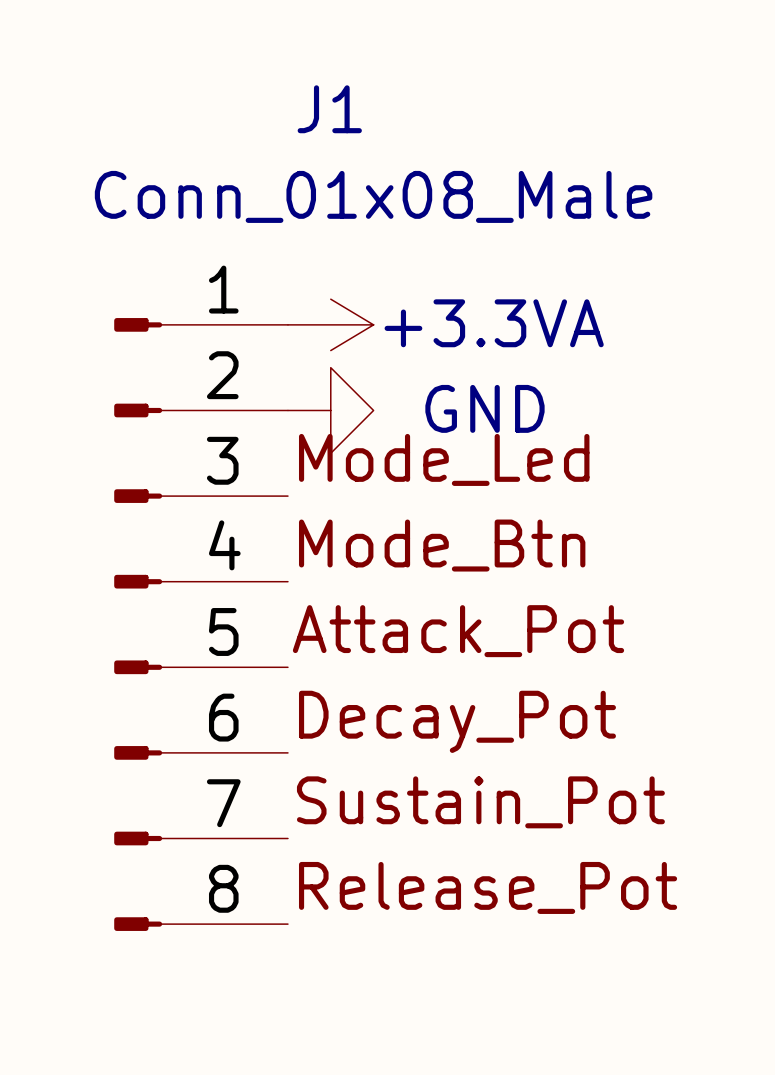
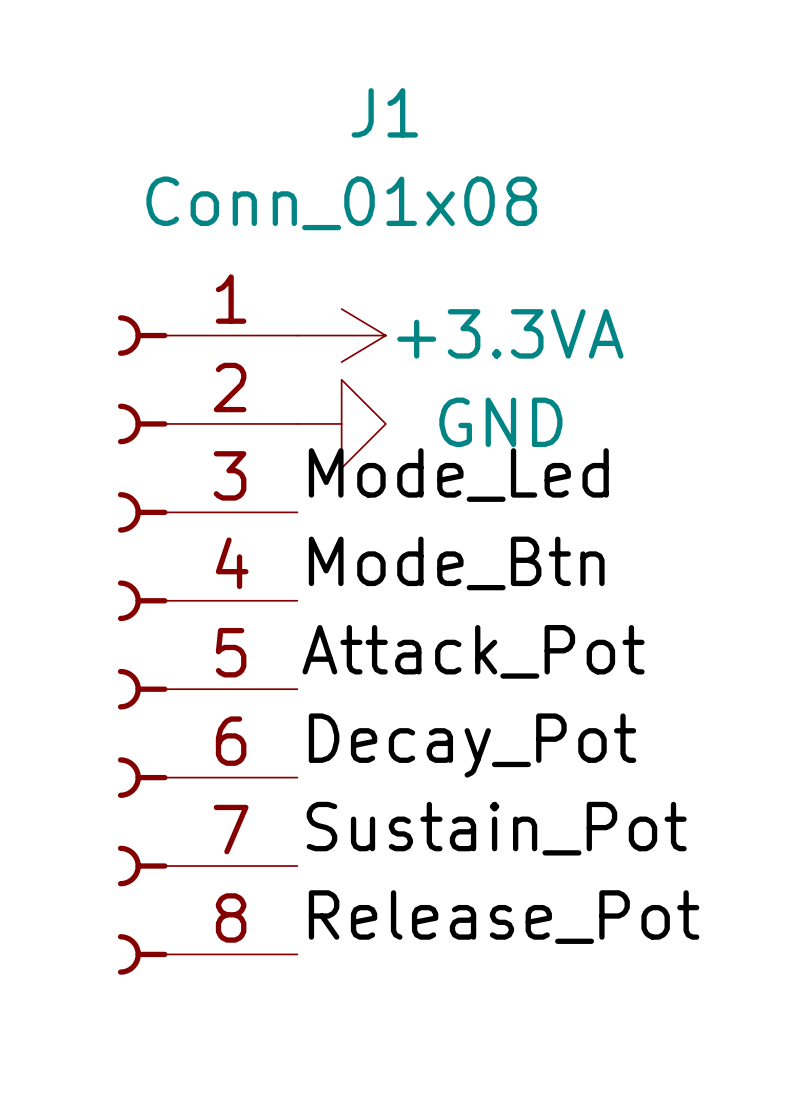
J1 name position: J1 (329, 109) -> J1 (384, 112)
J1 value: Conn_01x08_Male (373, 196) -> Conn_01x08 (341, 203)
J1 symbol: [114, 318, 288, 931] -> [117, 315, 298, 975]

